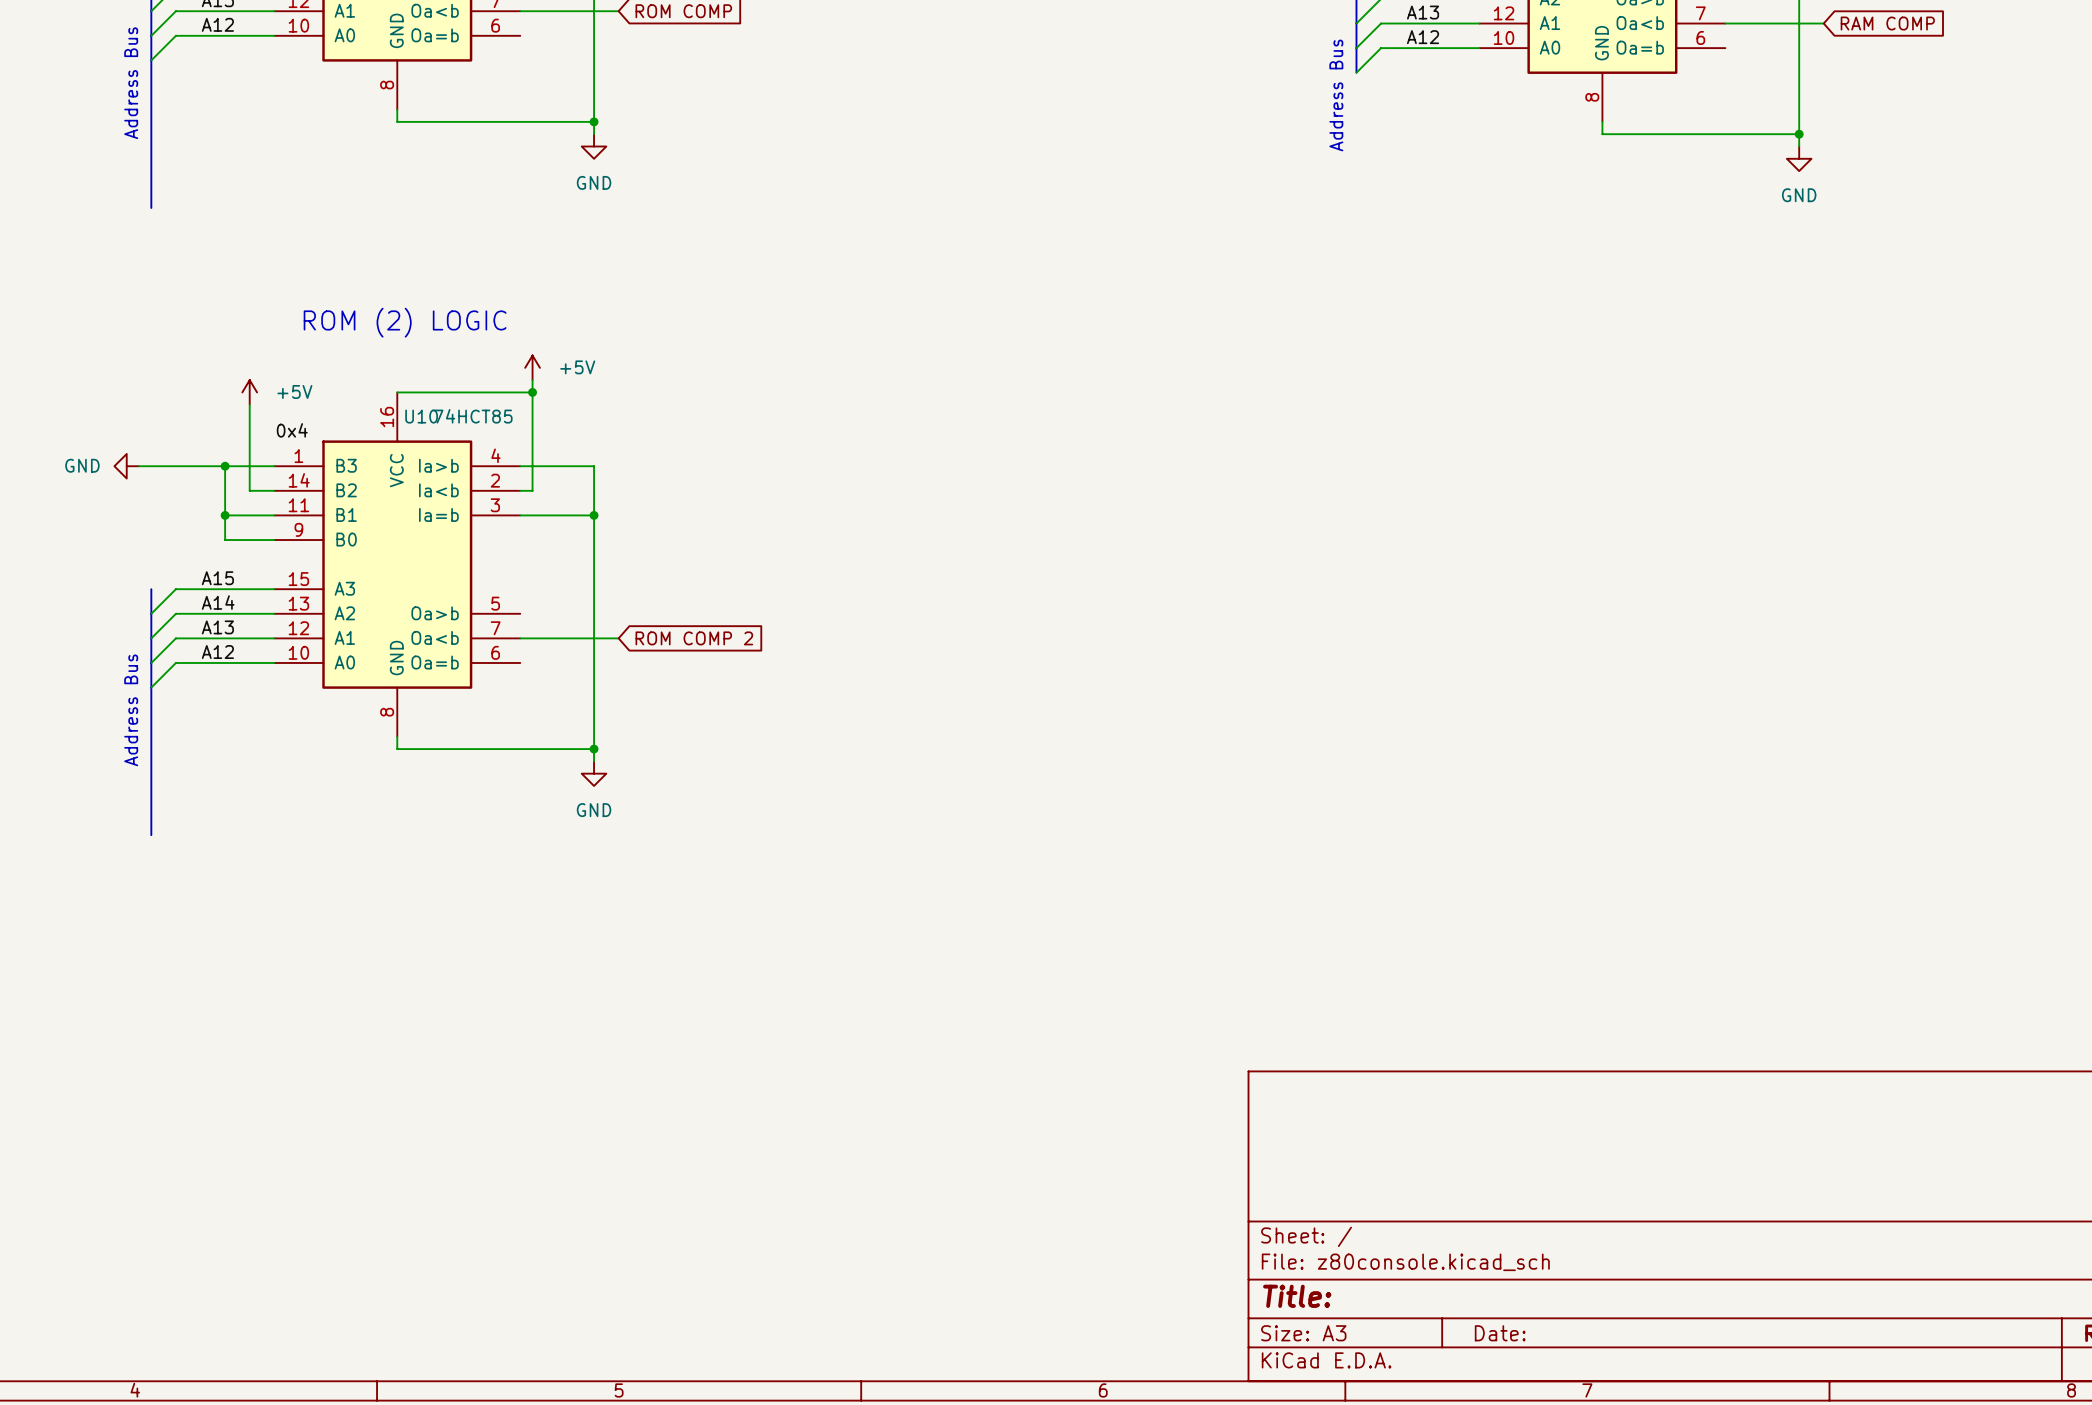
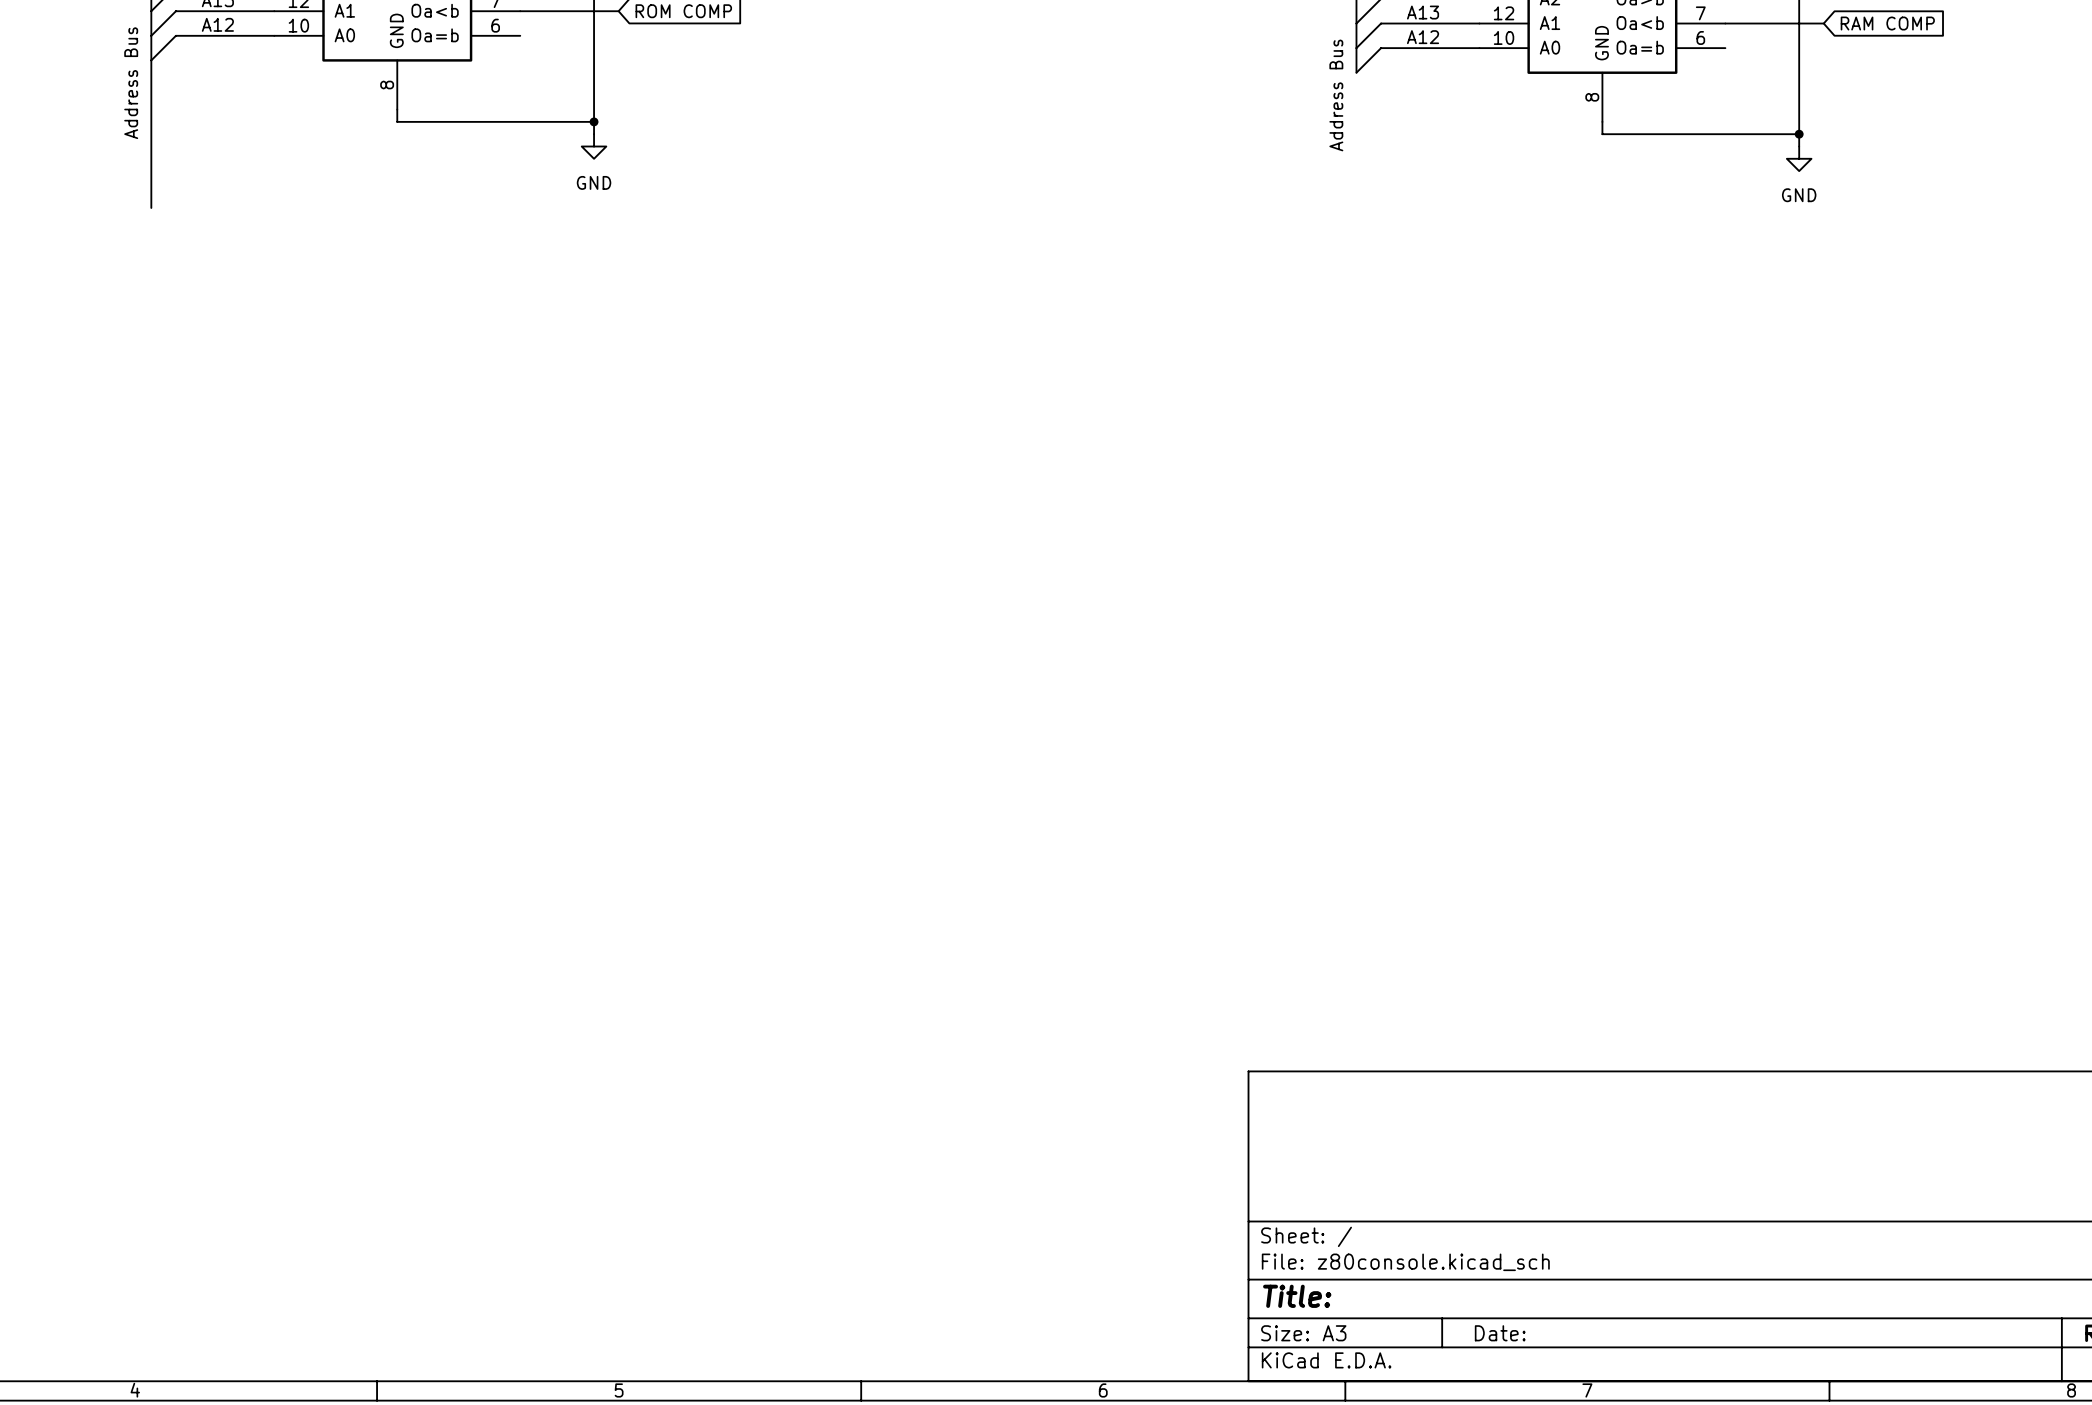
text: ROM (2) LOGIC (405, 322) -> none
power symbol: +5V (532, 367) -> none
wire: (532, 380) (532, 490) (520, 490) -> none
power symbol: +5V (249, 392) -> none
wire: (397, 392) (532, 392) -> none
junction: (532, 392) -> none
wire: (249, 404) (249, 490) (274, 490) -> none
label: 0x4 (292, 430) -> none
power symbol: GND (126, 466) -> none
wire: (139, 466) (274, 466) -> none
wire: (225, 466) (225, 540) (274, 540) -> none
junction: (225, 466) -> none
wire: (520, 466) (594, 466) (594, 761) -> none
wire: (225, 515) (274, 515) -> none
junction: (225, 515) -> none
wire: (520, 515) (594, 515) -> none
junction: (594, 515) -> none
U10: 74HCT85 (397, 564) -> none
label: A15 (217, 578) -> none
bus: (151, 589) (151, 835) -> none
wire: (274, 589) (175, 589) (151, 613) -> none
label: A14 (218, 602) -> none
wire: (274, 613) (175, 613) (151, 638) -> none
label: A13 (217, 627) -> none
wire: (274, 638) (175, 638) (151, 662) -> none
wire: (520, 638) (618, 638) -> none
global label: ROM COMP 2 (694, 638) -> none
label: A12 (217, 652) -> none
wire: (274, 662) (175, 662) (151, 687) -> none
text: Address Bus (131, 710) -> none
wire: (397, 736) (397, 749) (594, 749) -> none
junction: (594, 749) -> none
power symbol: GND (594, 773) -> none

